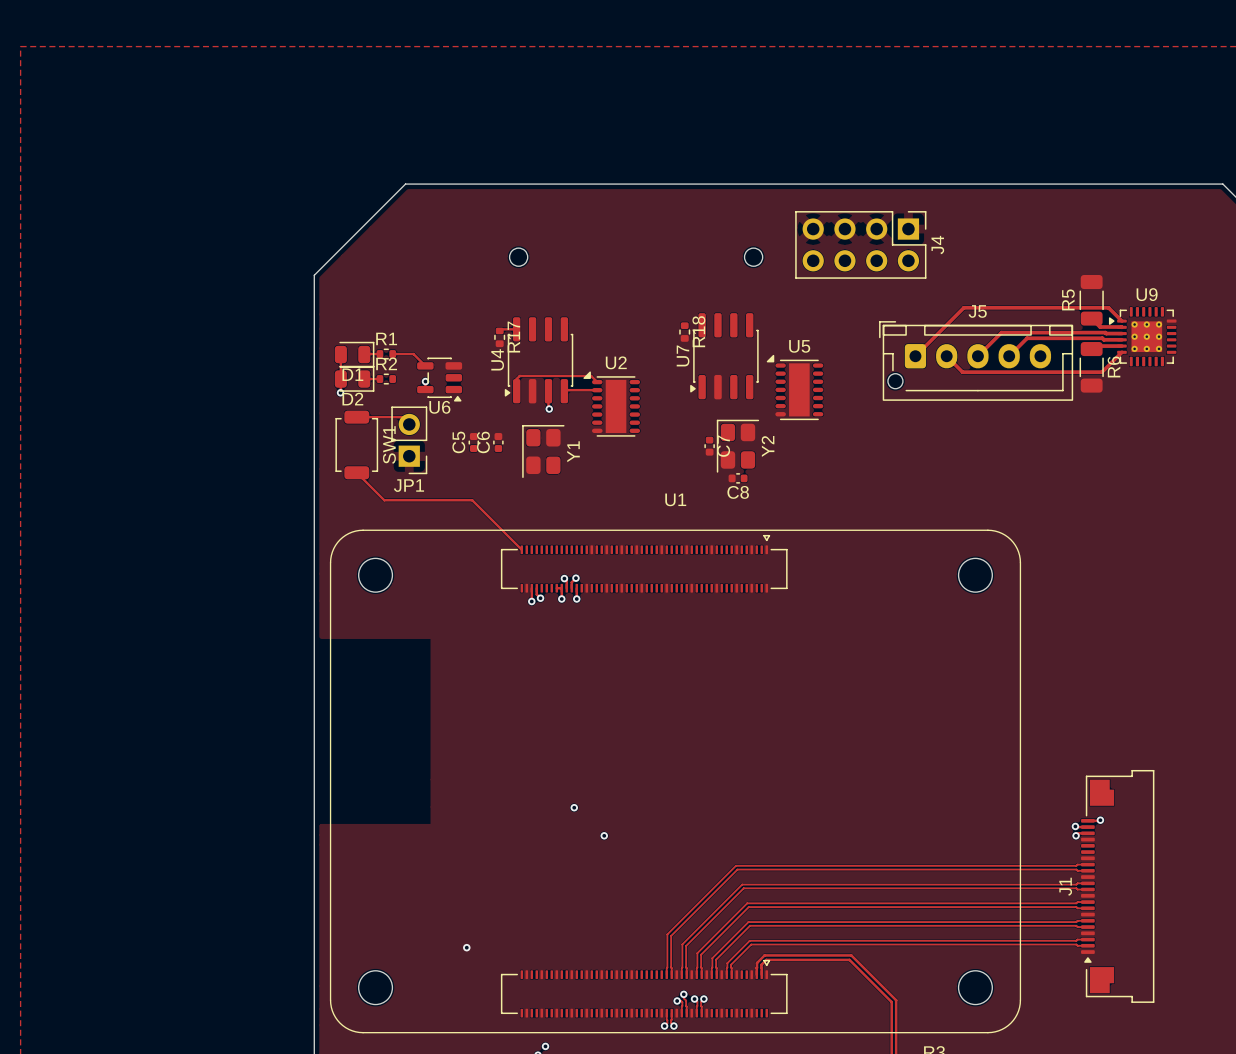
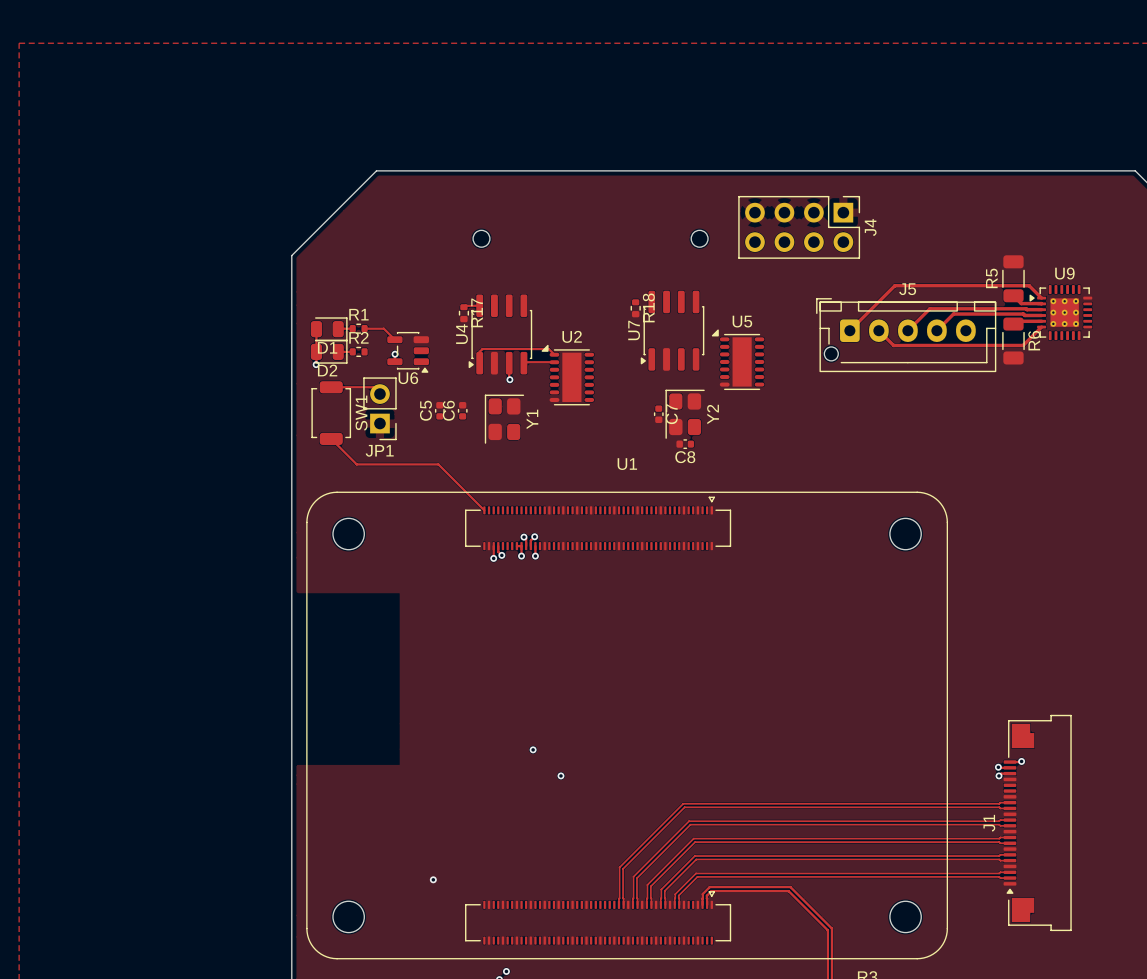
track: (683, 994) (686, 1013) -> none
via: (683, 994) -> none
track: (694, 999) (697, 1001) (696, 1013) -> none
via: (694, 999) -> none
track: (703, 999) (701, 1001) (701, 1013) -> none
via: (703, 999) -> none
track: (677, 1000) (682, 1002) (681, 1013) -> none
via: (677, 1000) -> none
track: (666, 1013) (667, 1023) (664, 1026) -> none
track: (671, 1013) (671, 1023) (673, 1026) -> none
via: (664, 1026) -> none
via: (673, 1026) -> none

